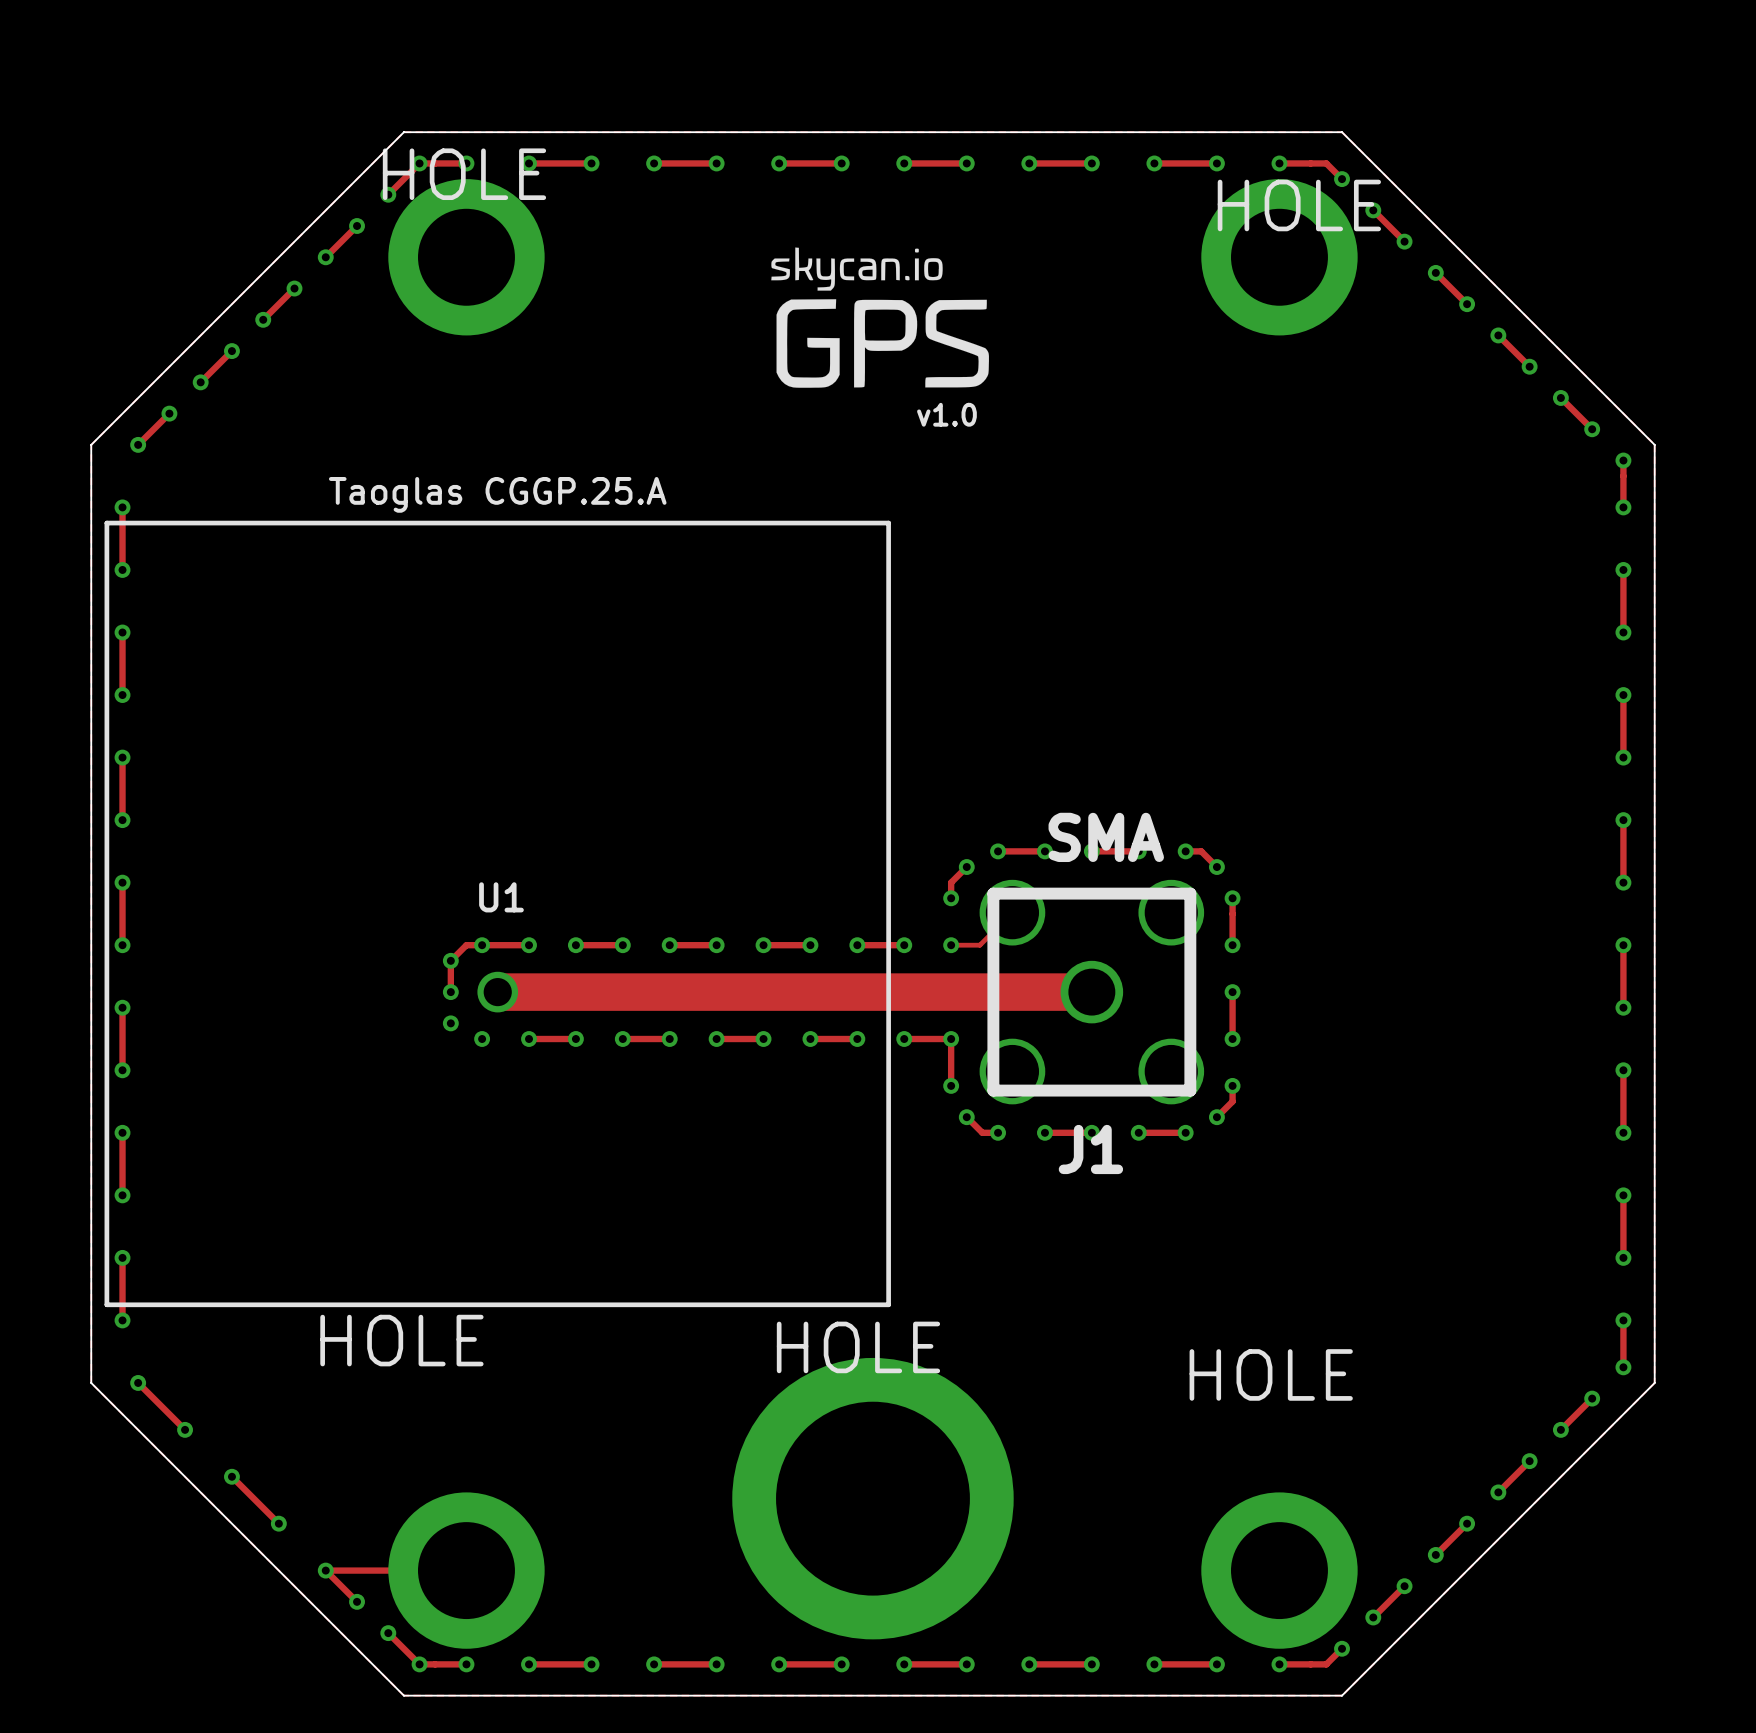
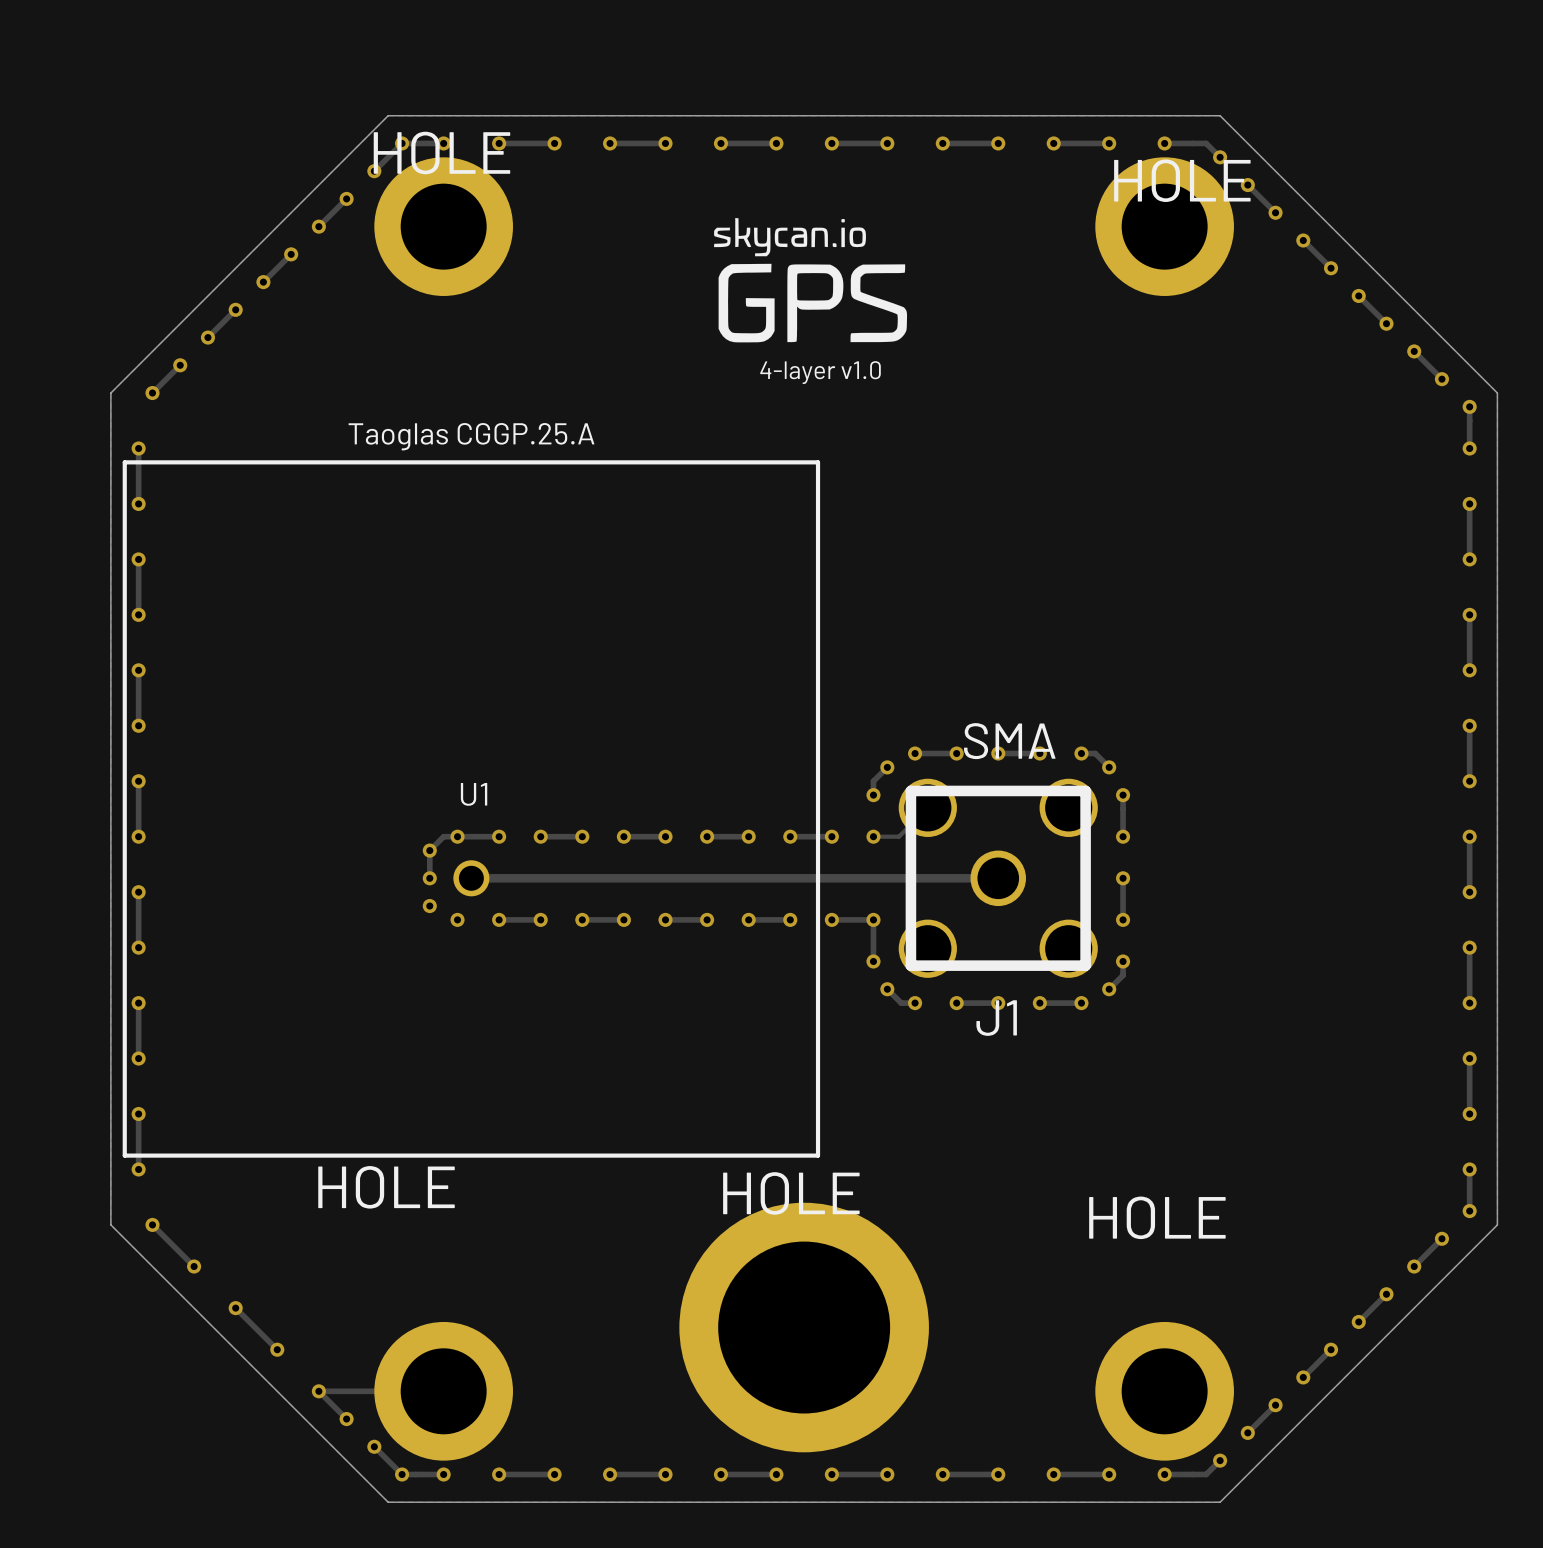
text: v1.0 (946, 414) -> none
text: none -> 4-layer v1.0 (820, 372)
track width: thick (497, 992) (1091, 992) -> thin (471, 878) (998, 878)

